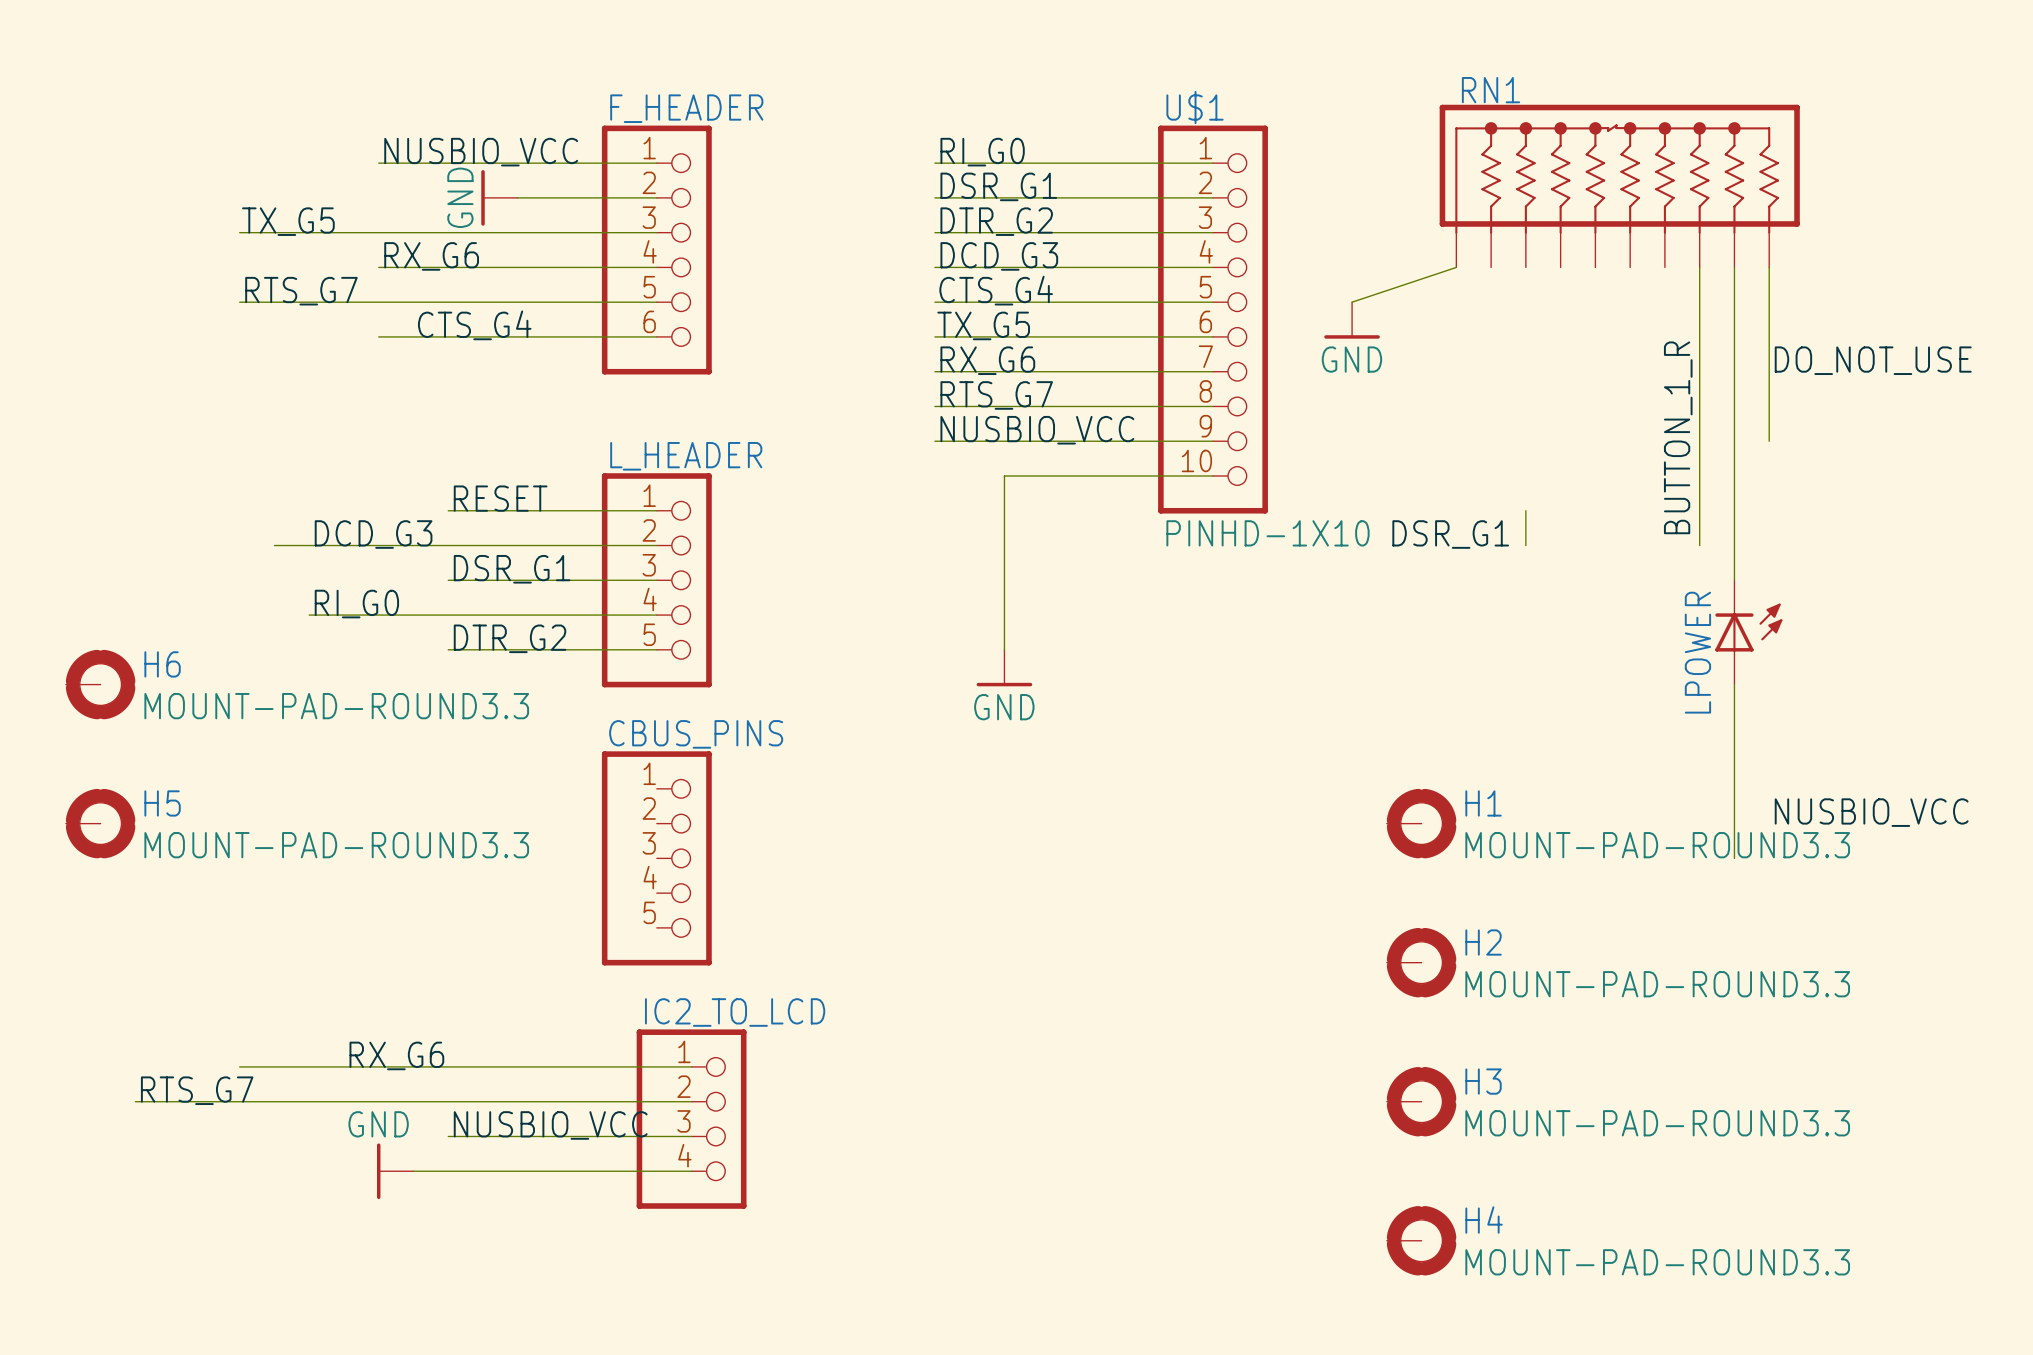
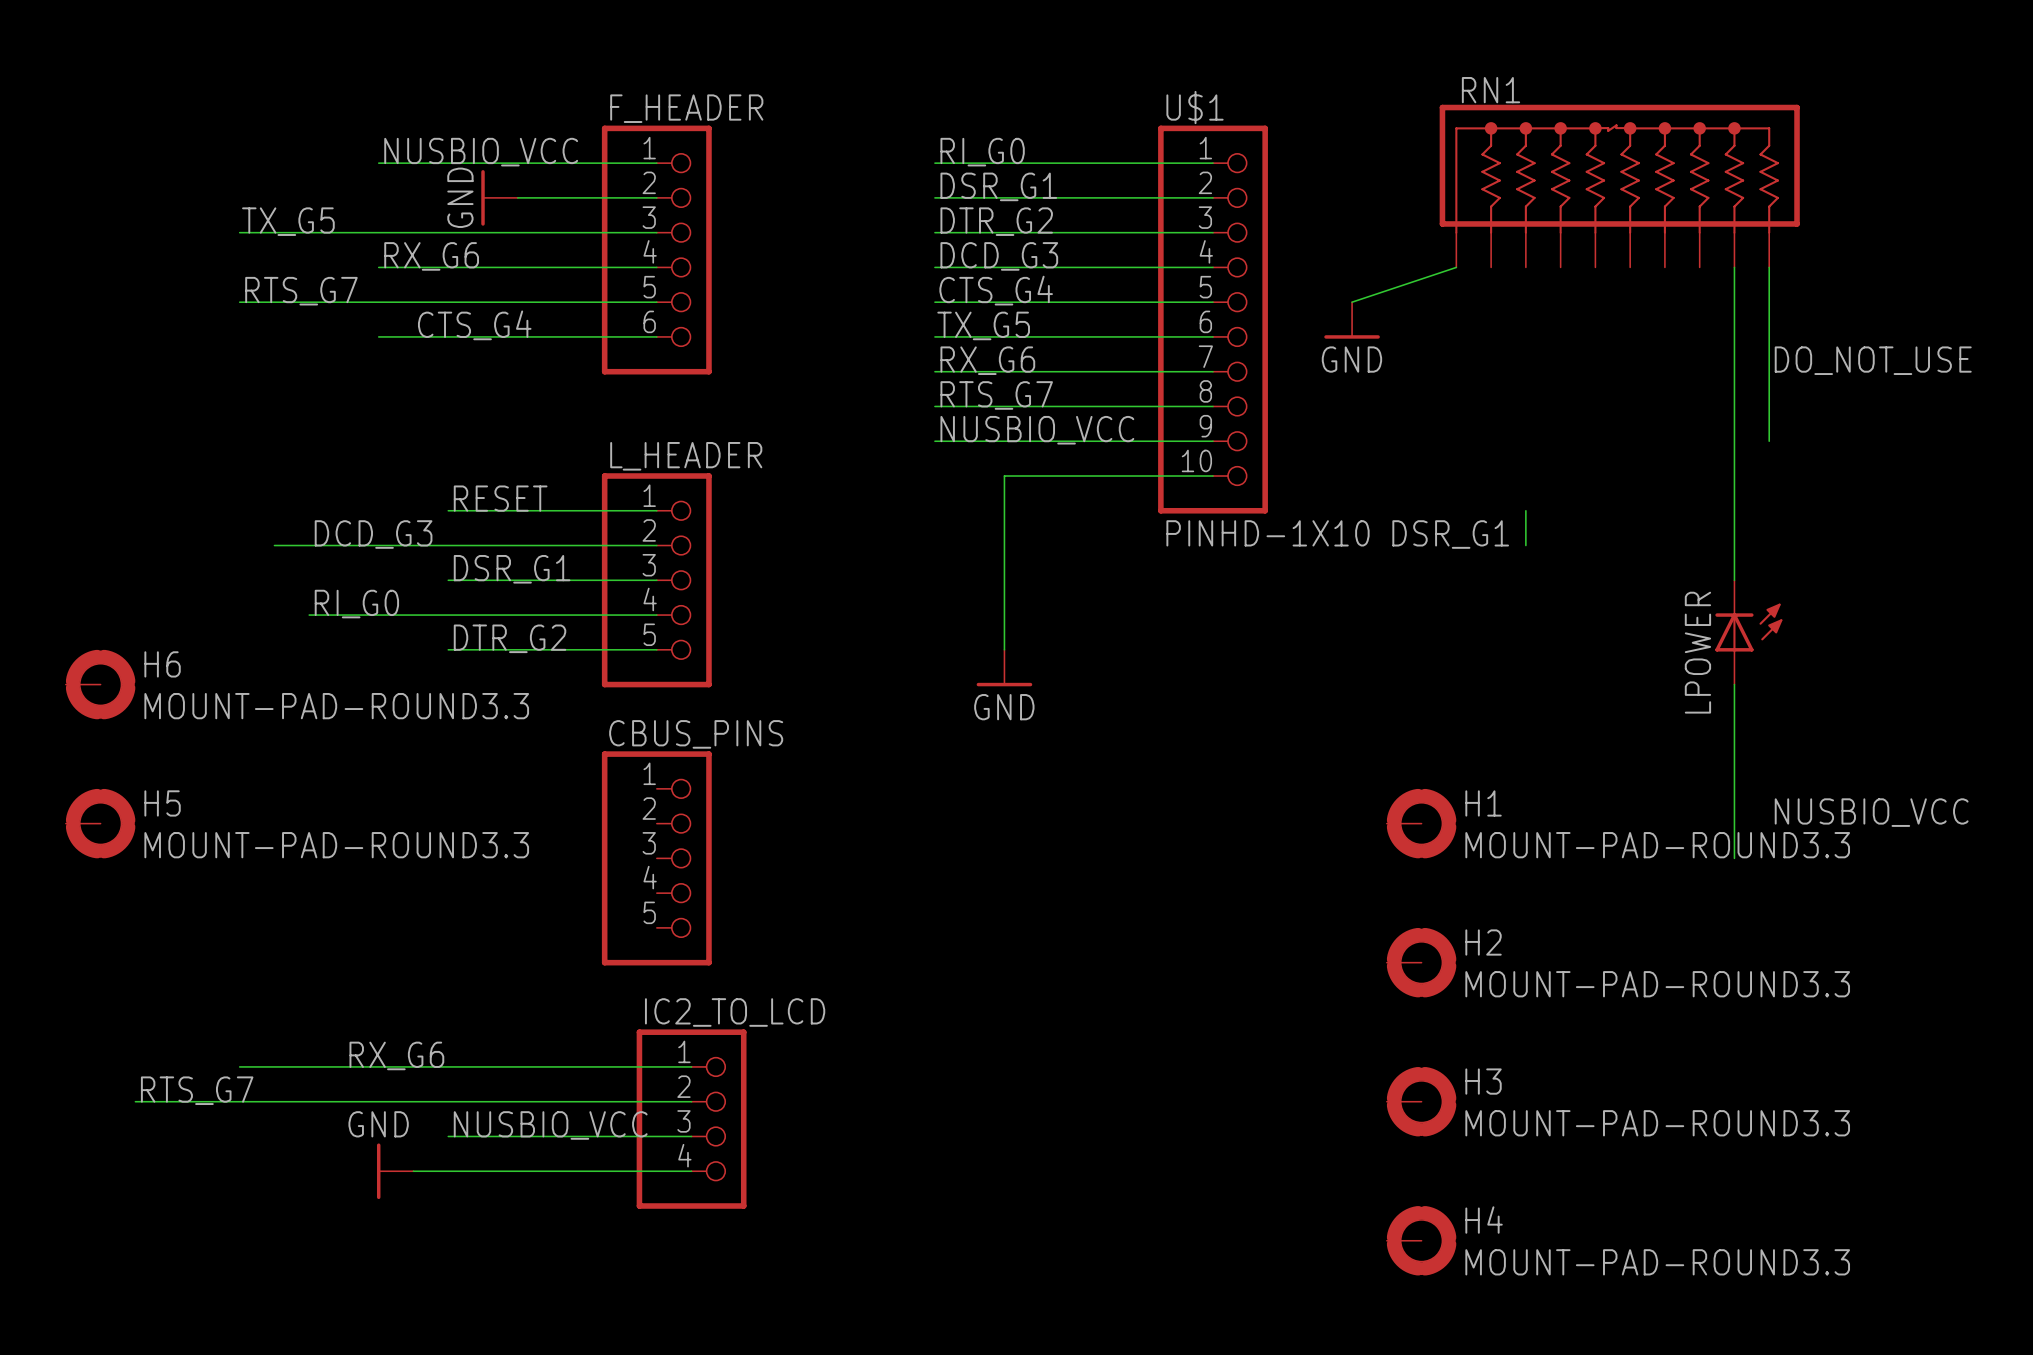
wire: (1699, 267) (1699, 545) -> none
label: BUTTON_1_R (1678, 437) -> none

